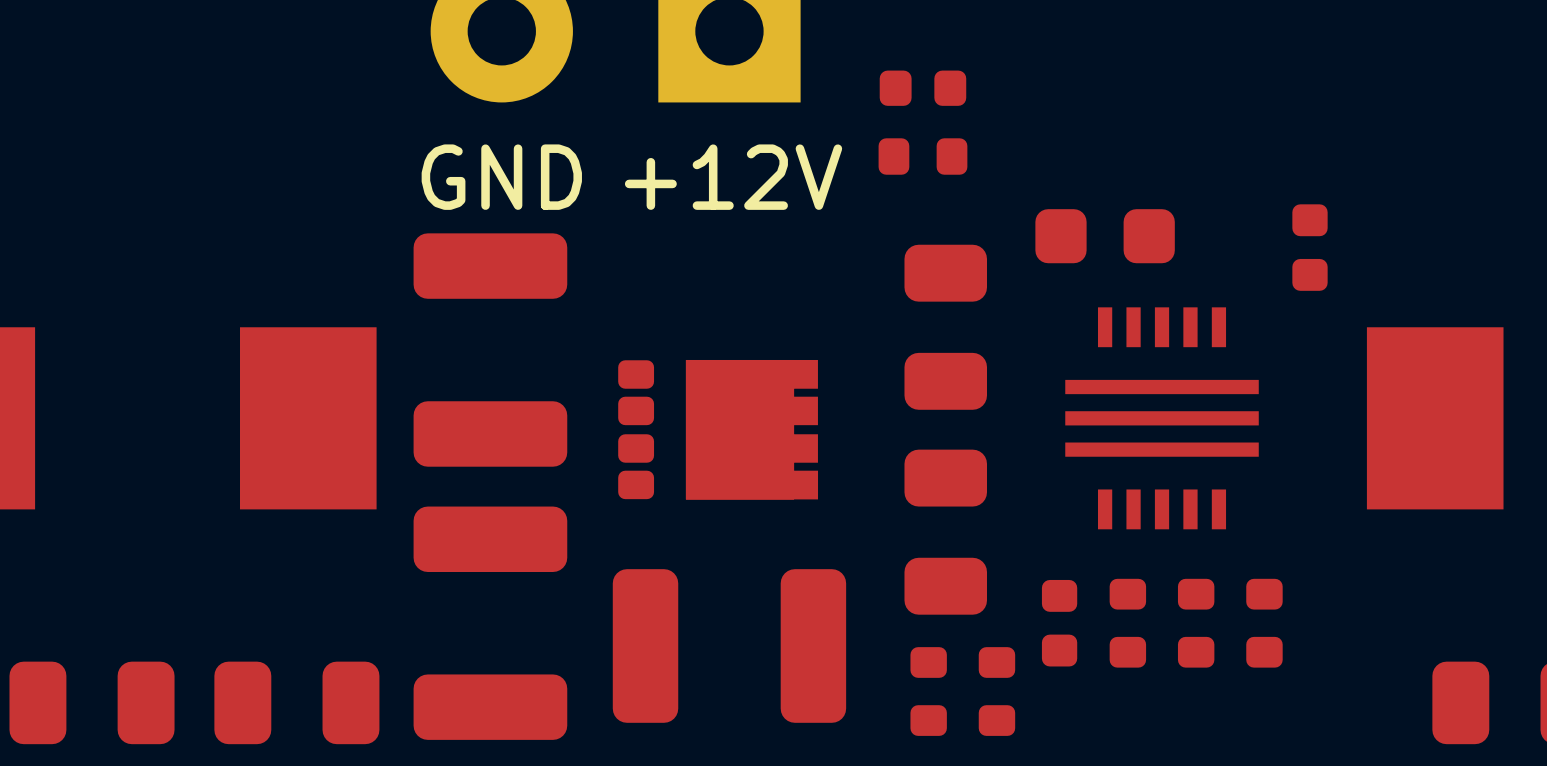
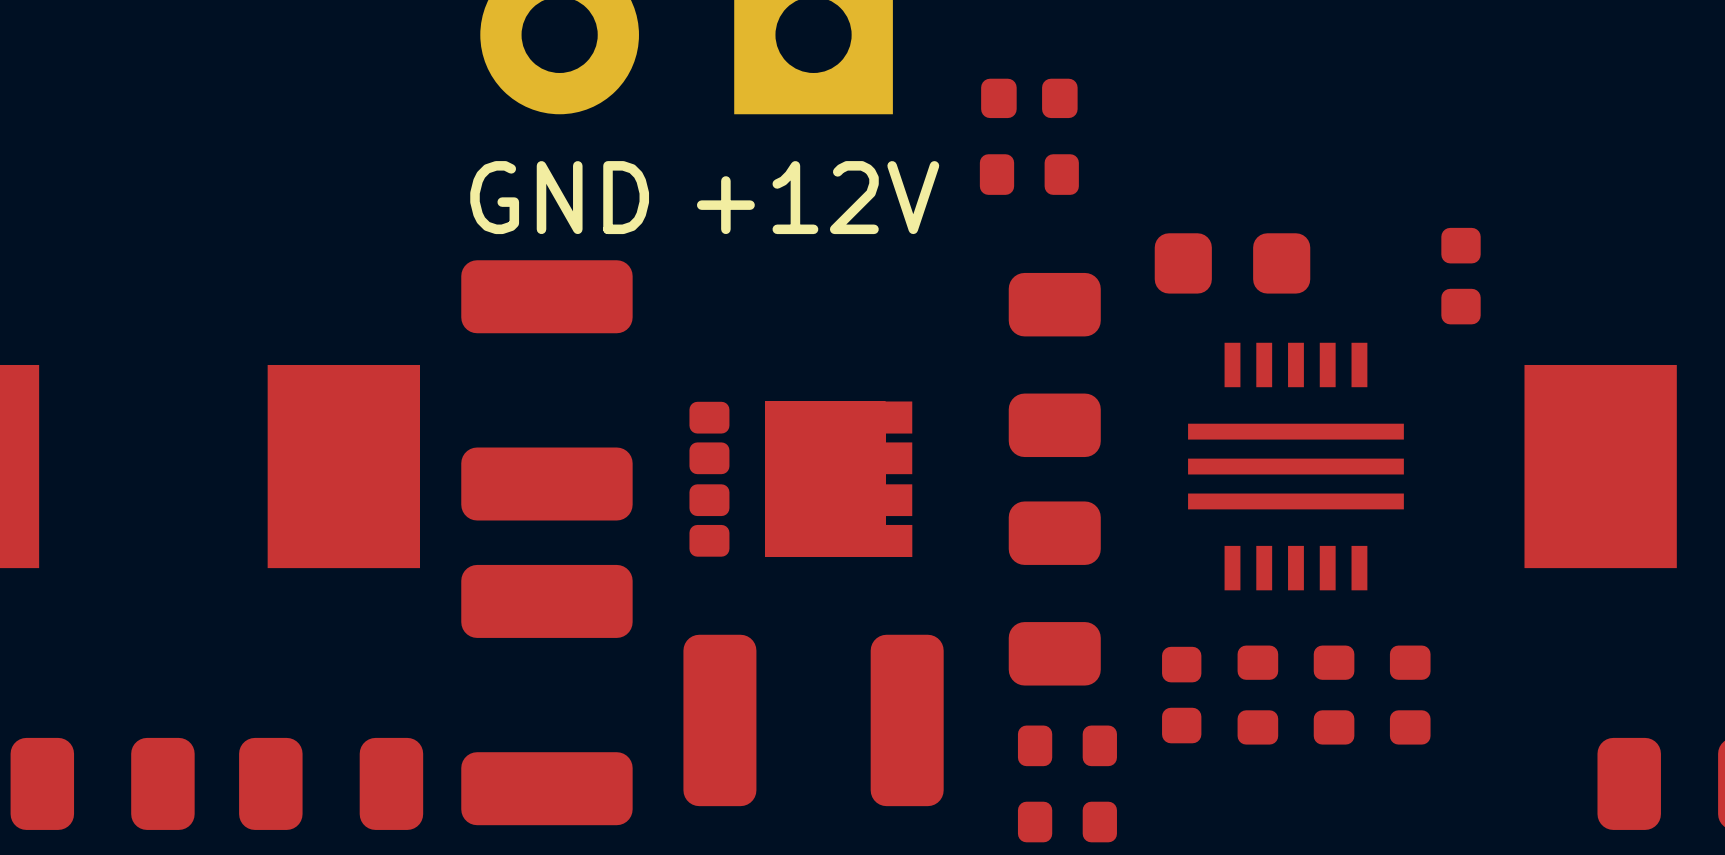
part: none -> (1067, 745)
part: (928, 691) -> none
part: (996, 691) -> none
part: none -> (1067, 822)

